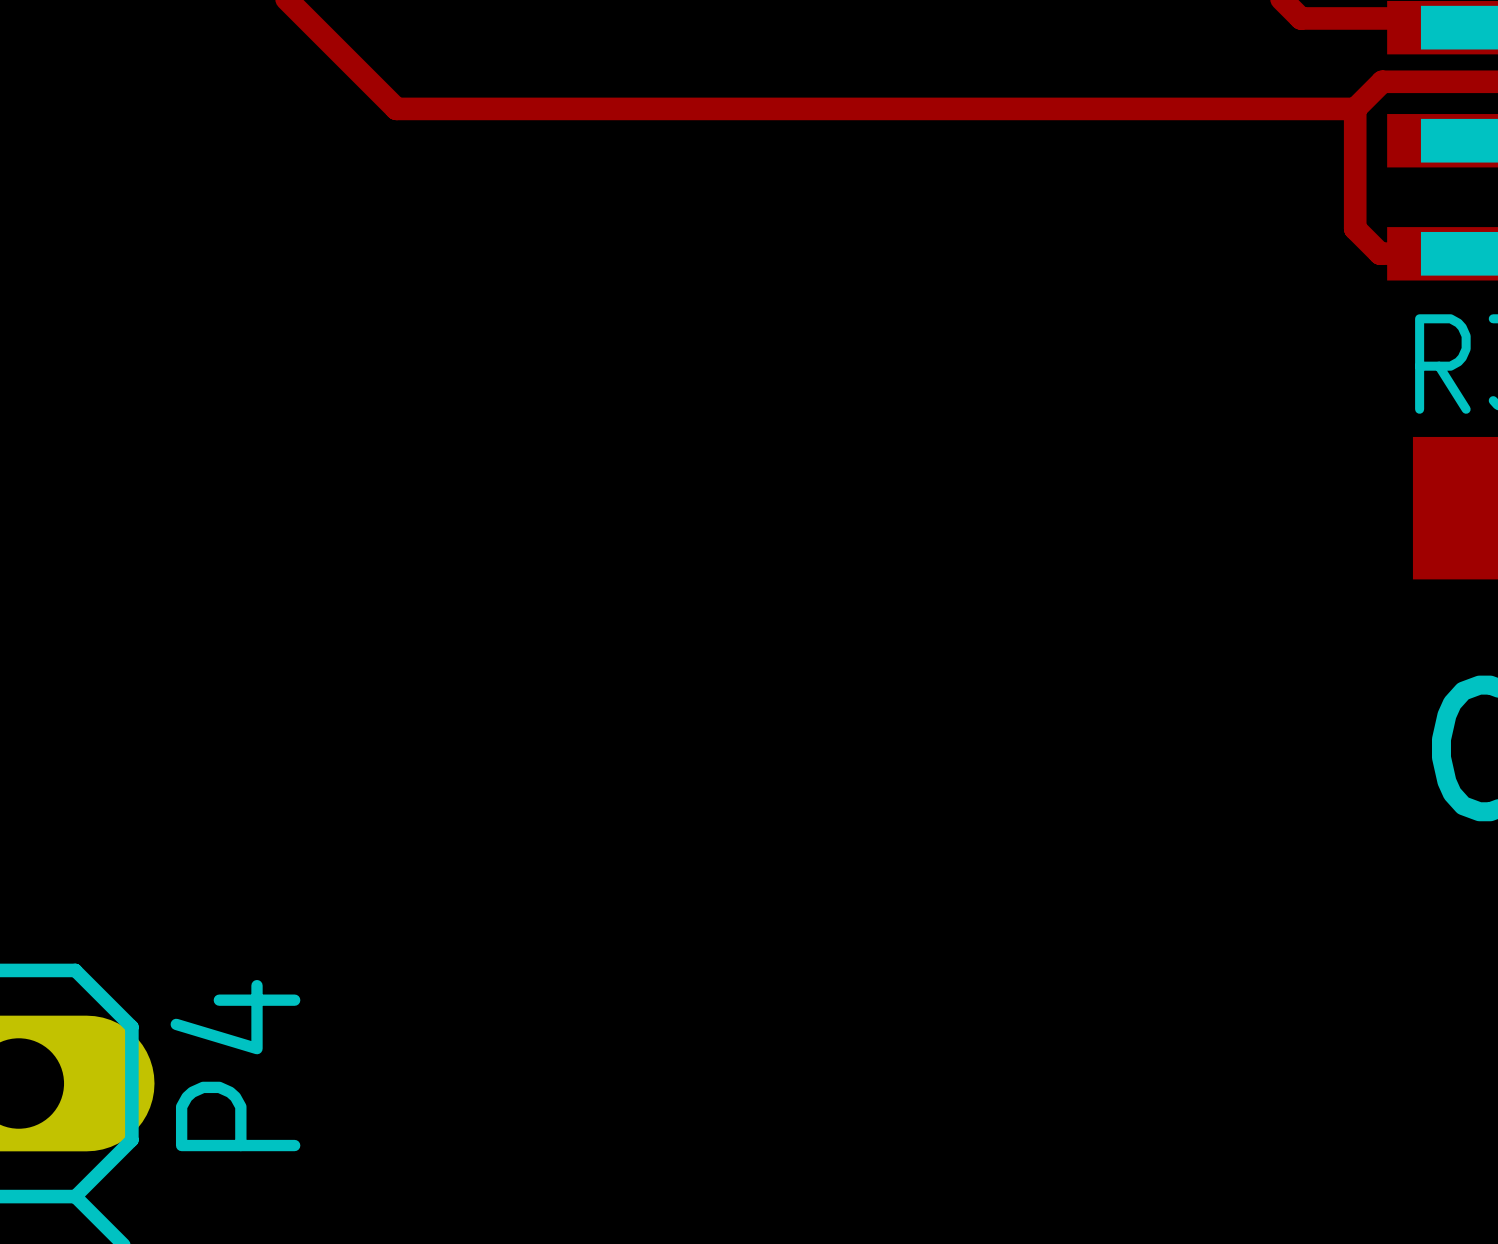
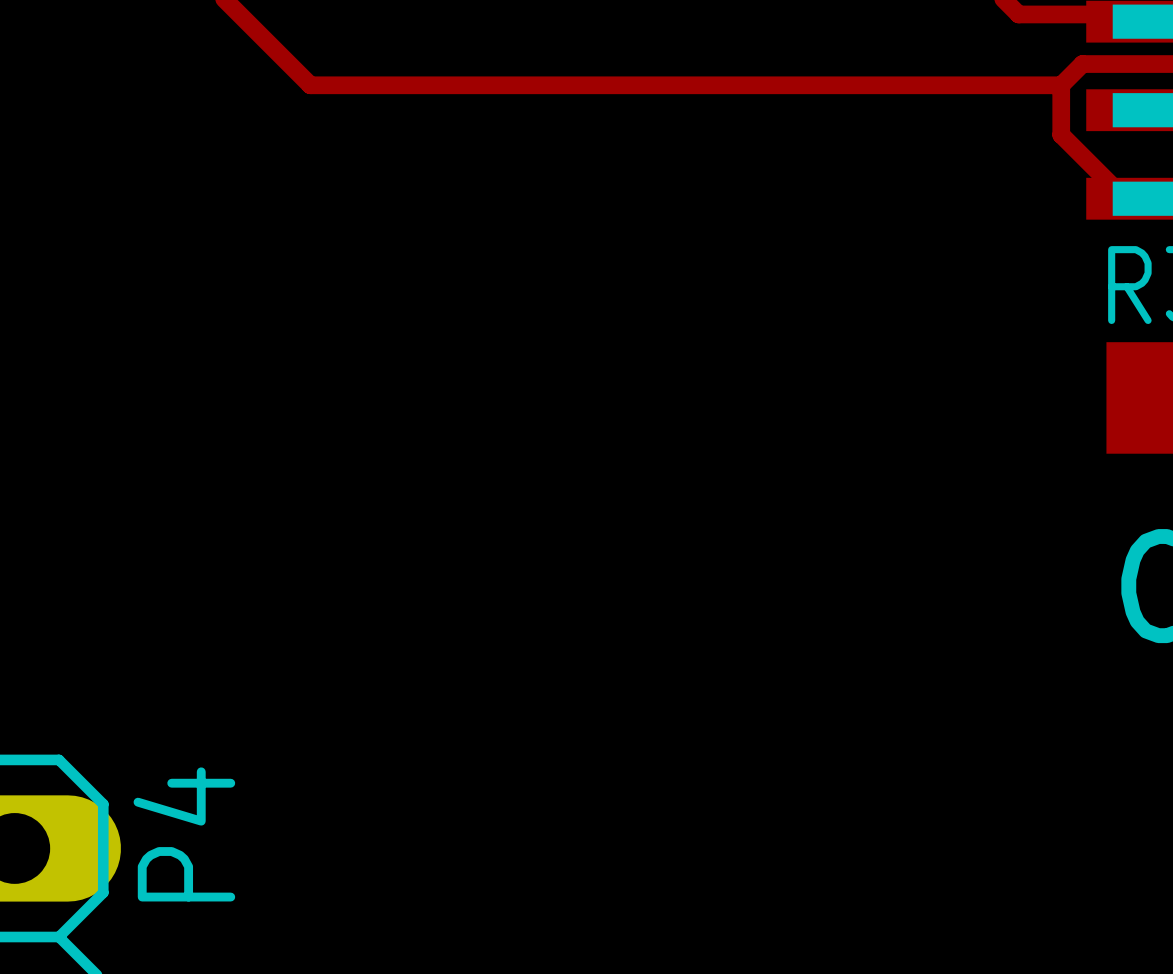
top track: (1355, 172) (1355, 228) (1380, 253) (1436, 253) -> (1061, 134) (1124, 198)

